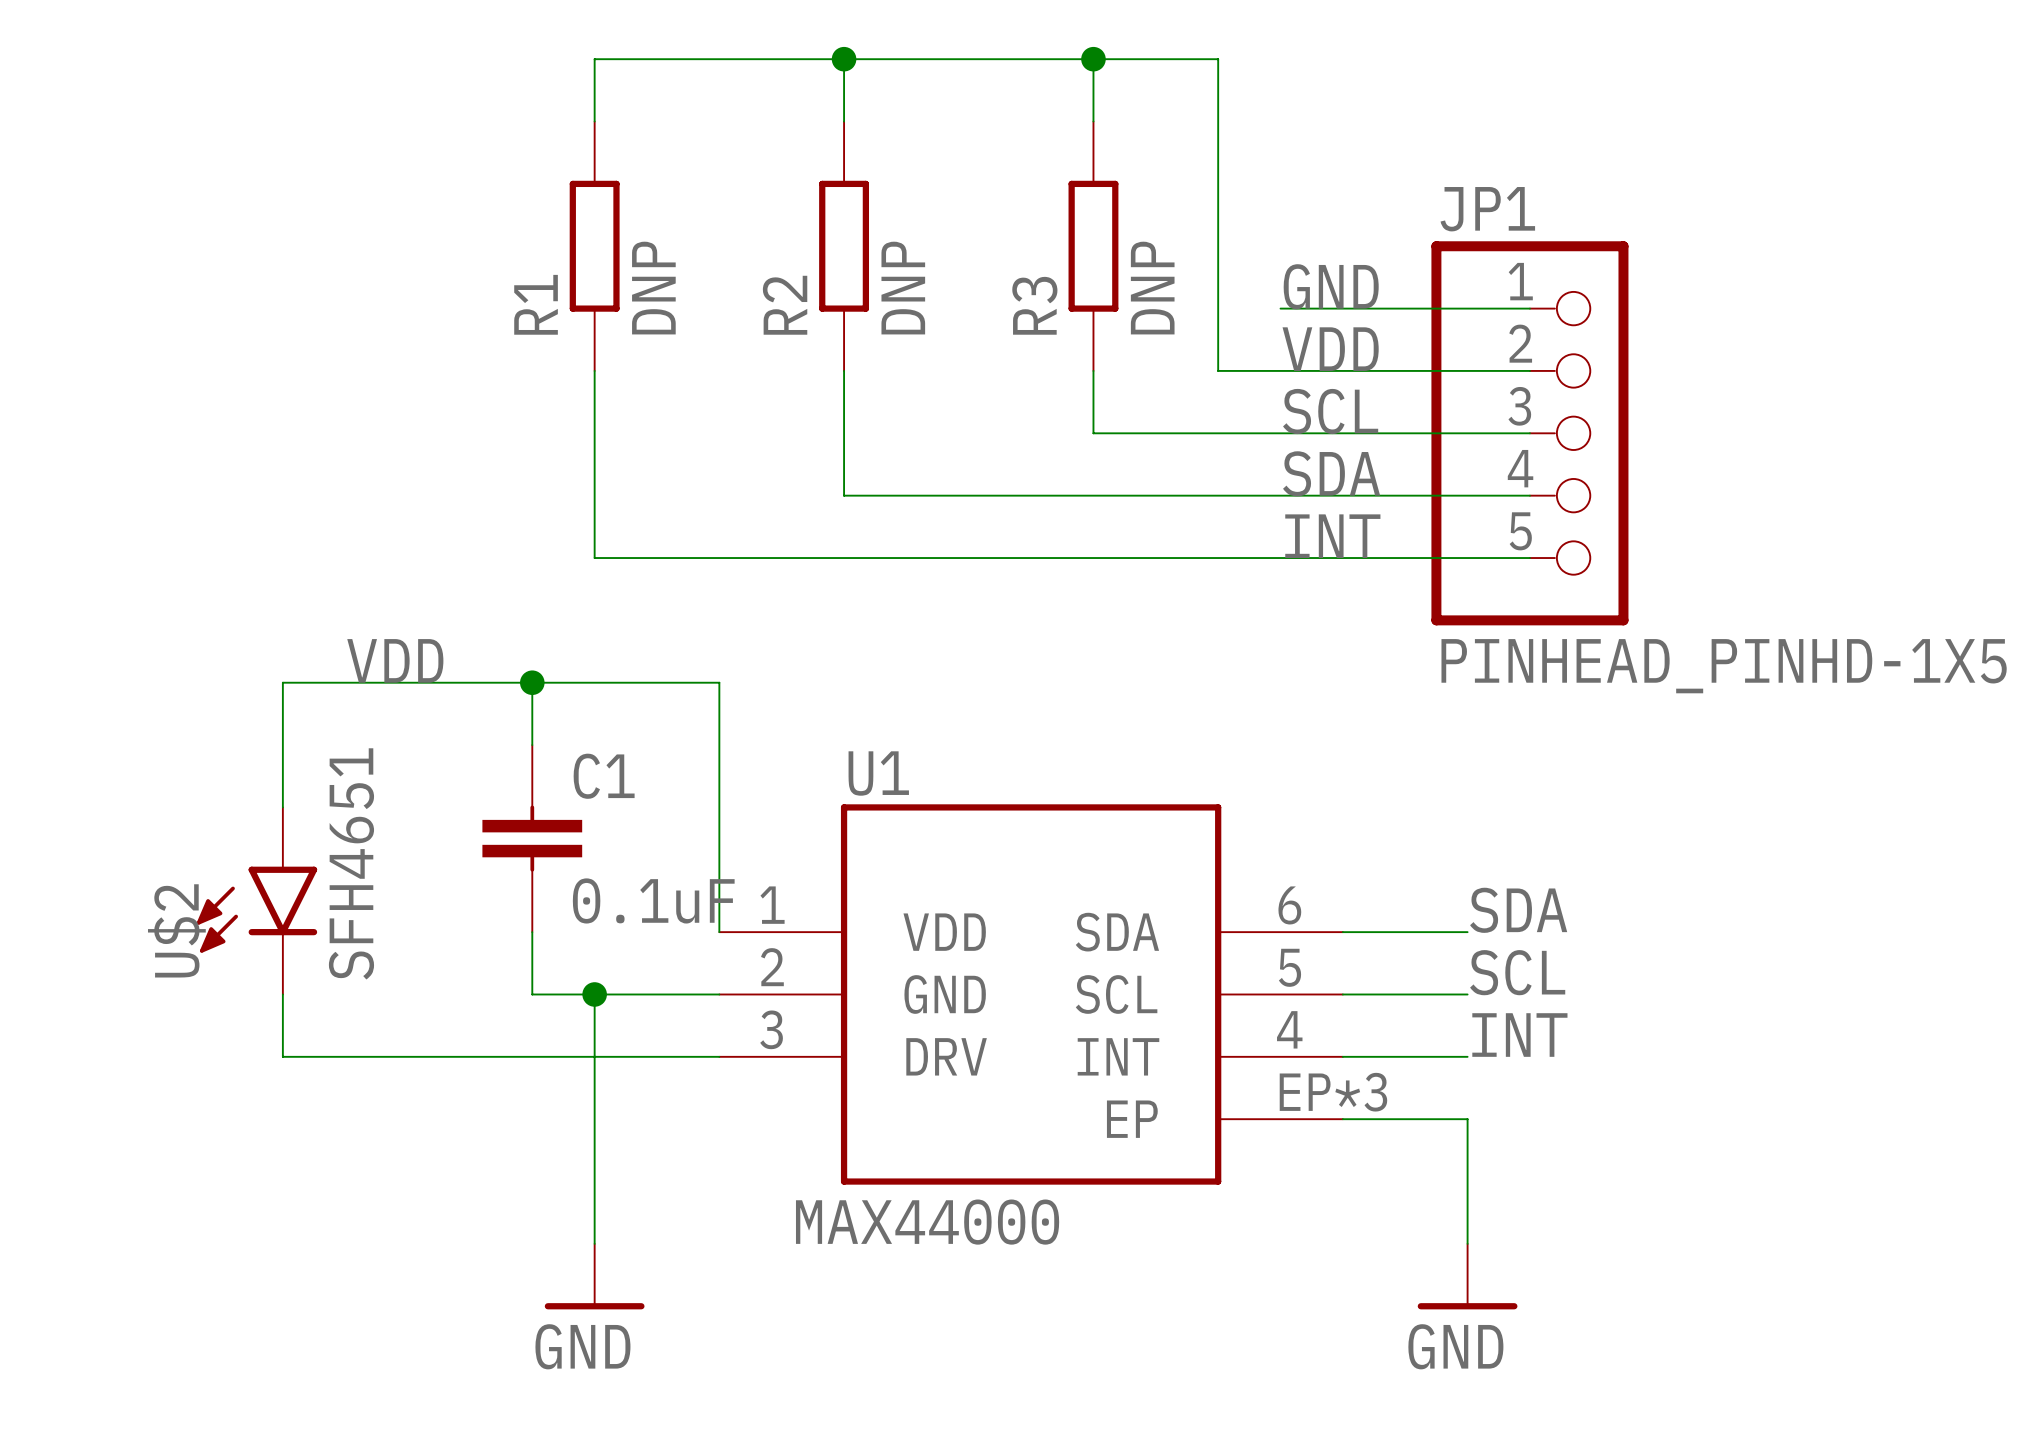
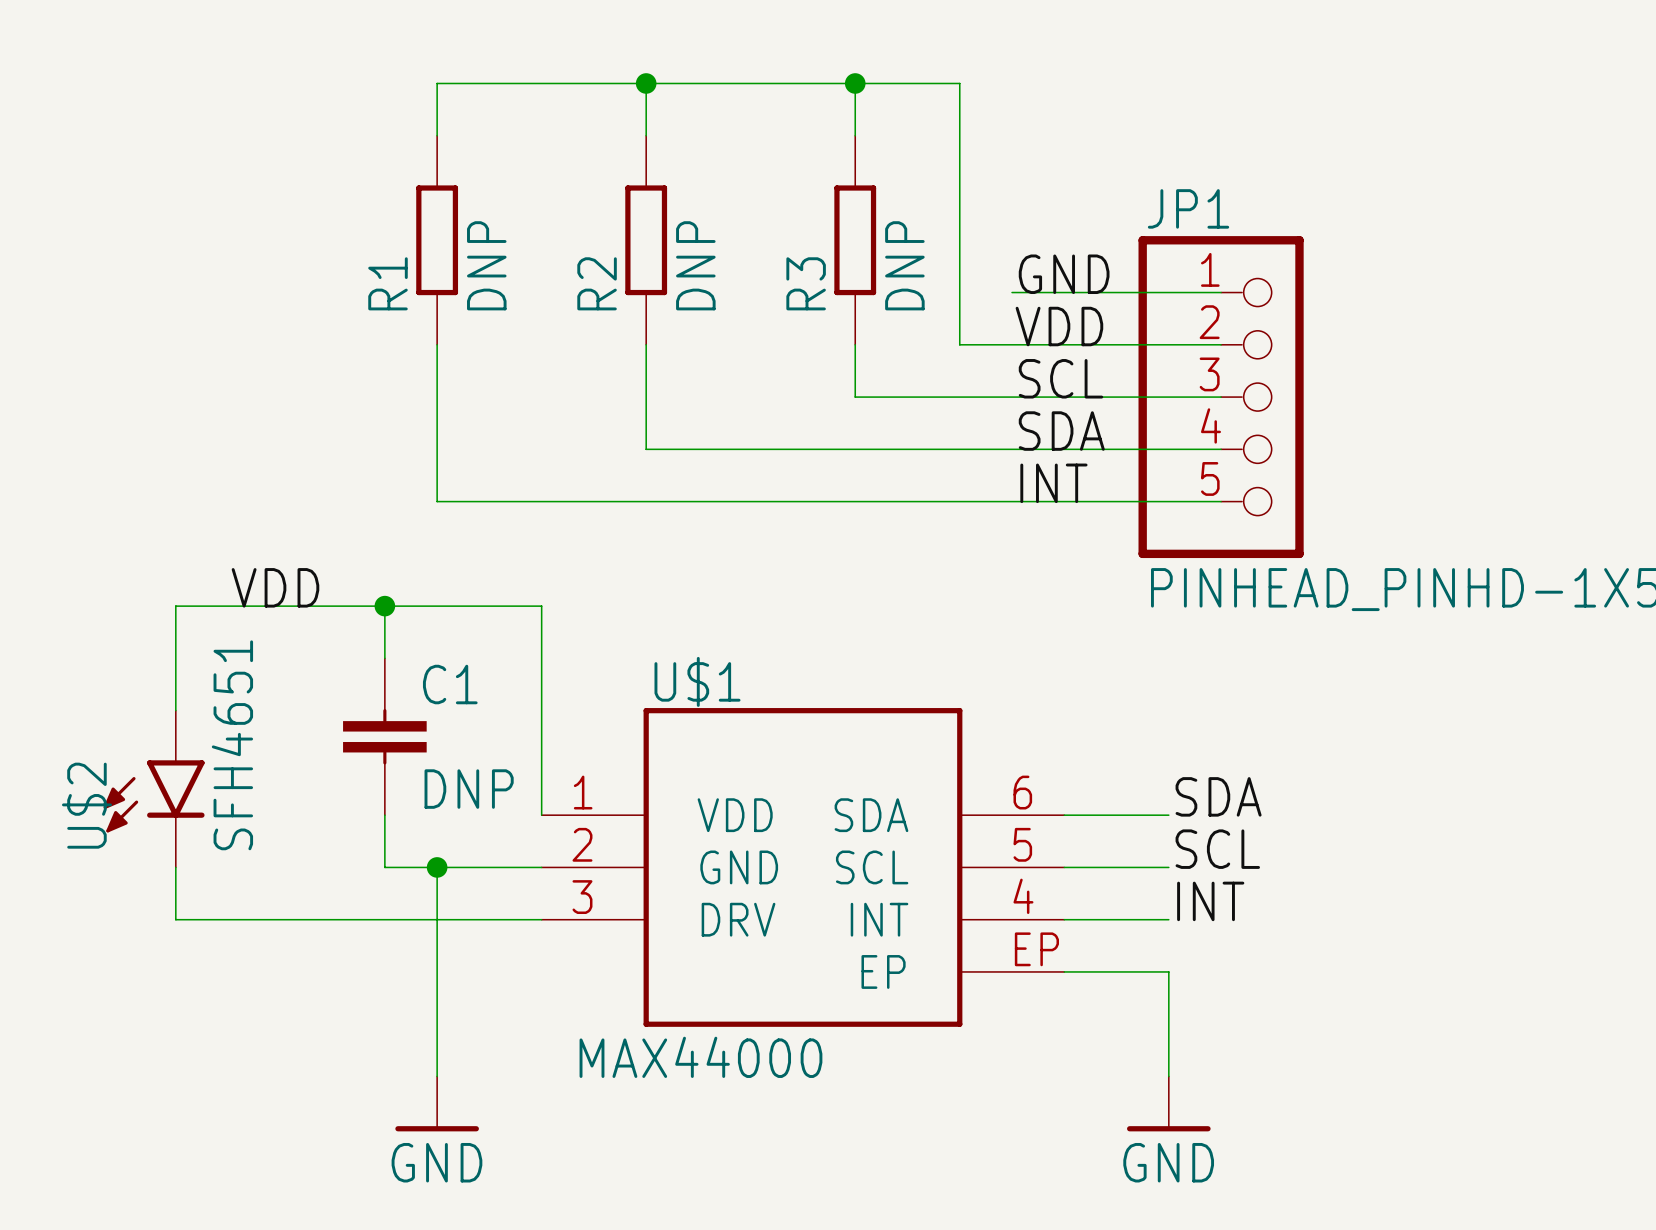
U1 name: U1 (878, 773) -> U$1 (697, 681)
C1 value: 0.1uF (653, 900) -> DNP (469, 789)
U1 pin number: EP*3 (1333, 1092) -> EP (1036, 949)

